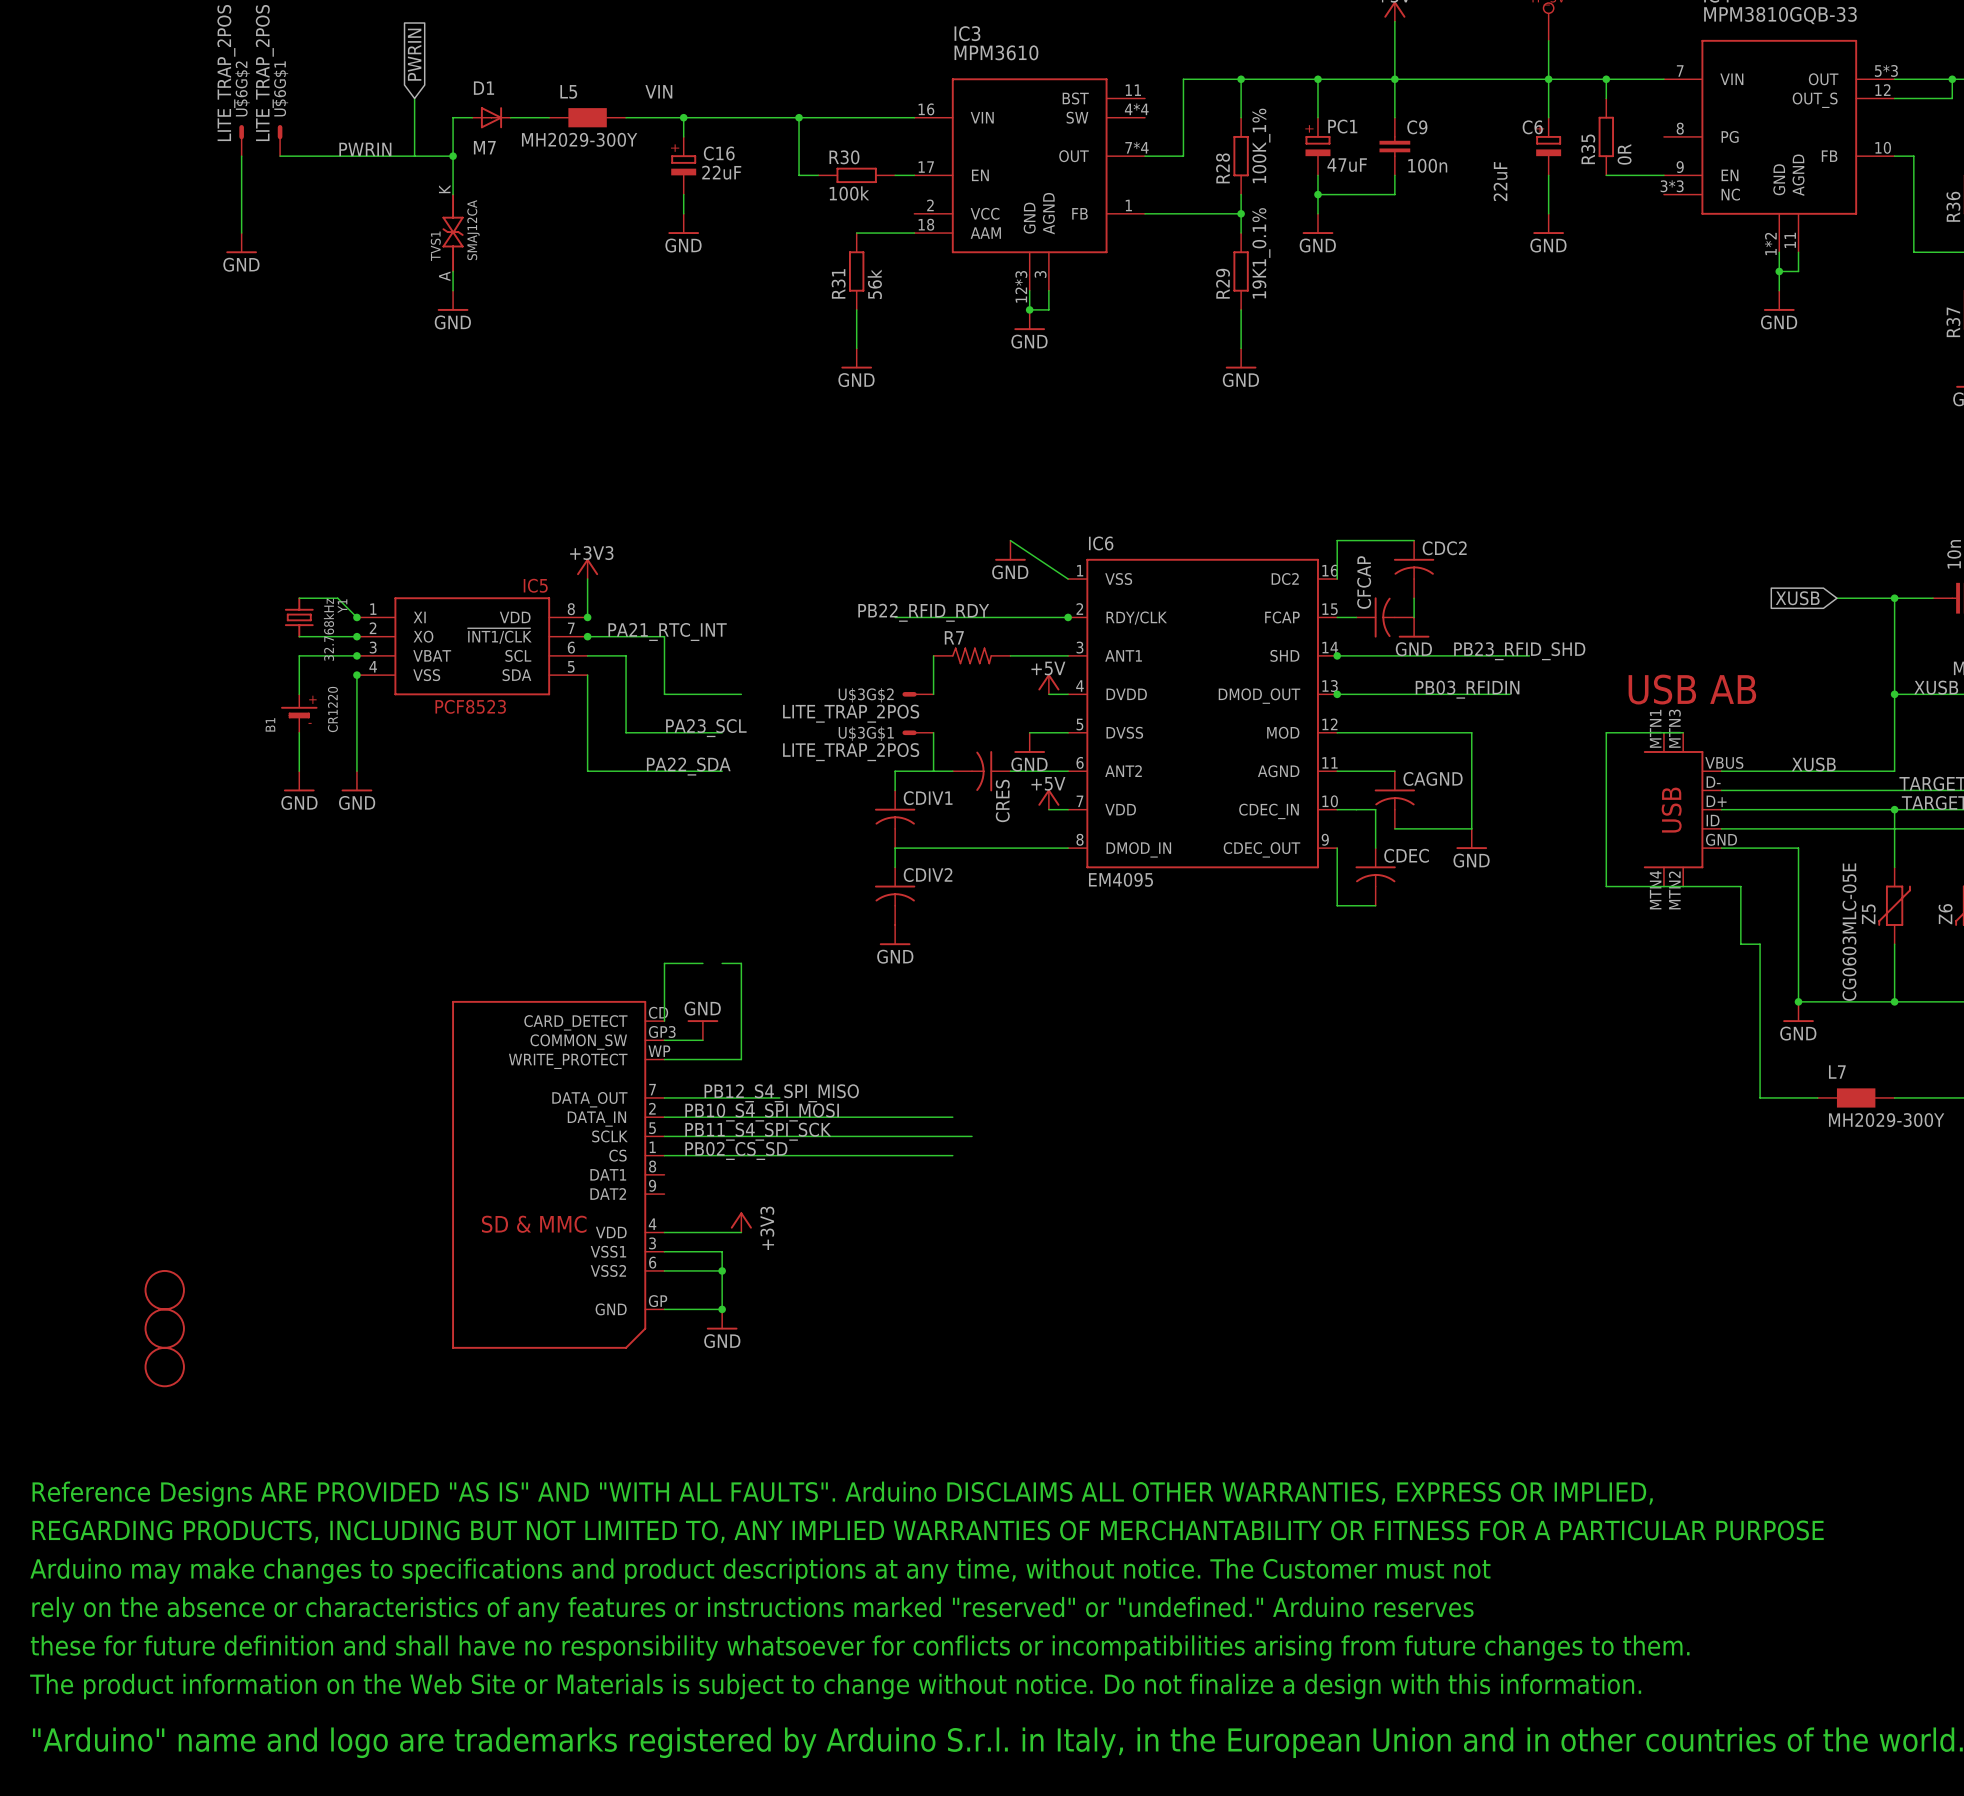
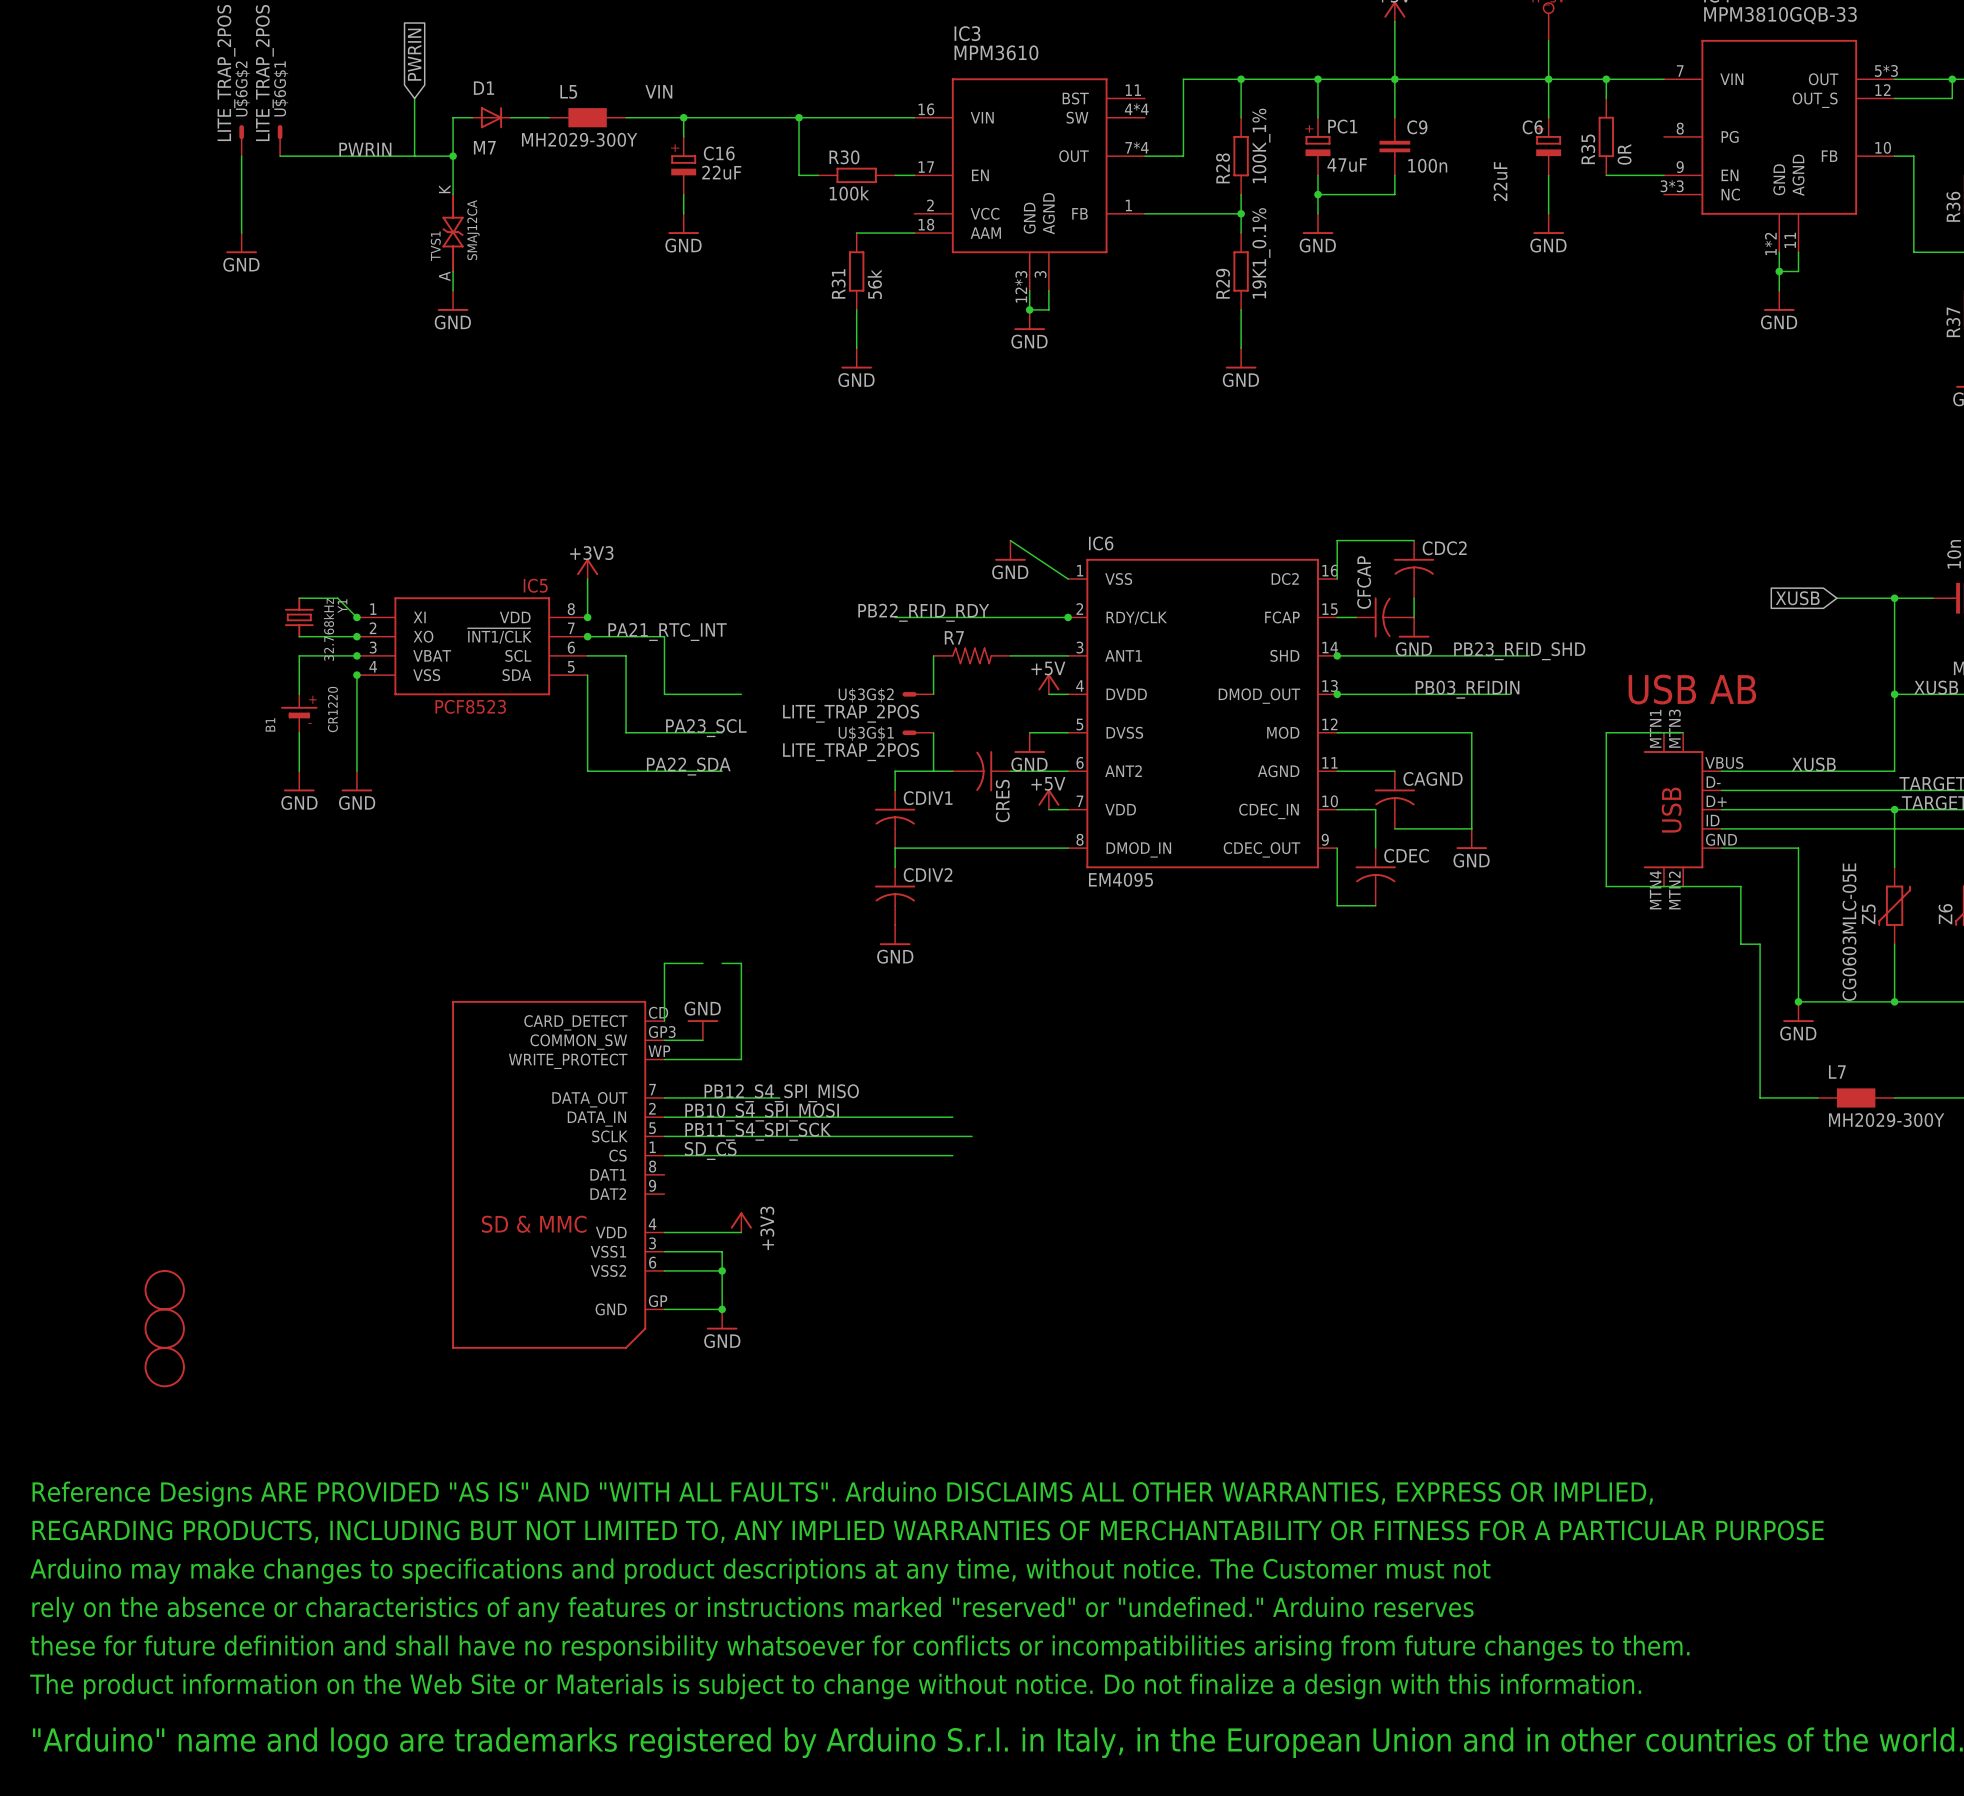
label: PB02_CS_SD (736, 1150) -> SD_CS (710, 1150)

